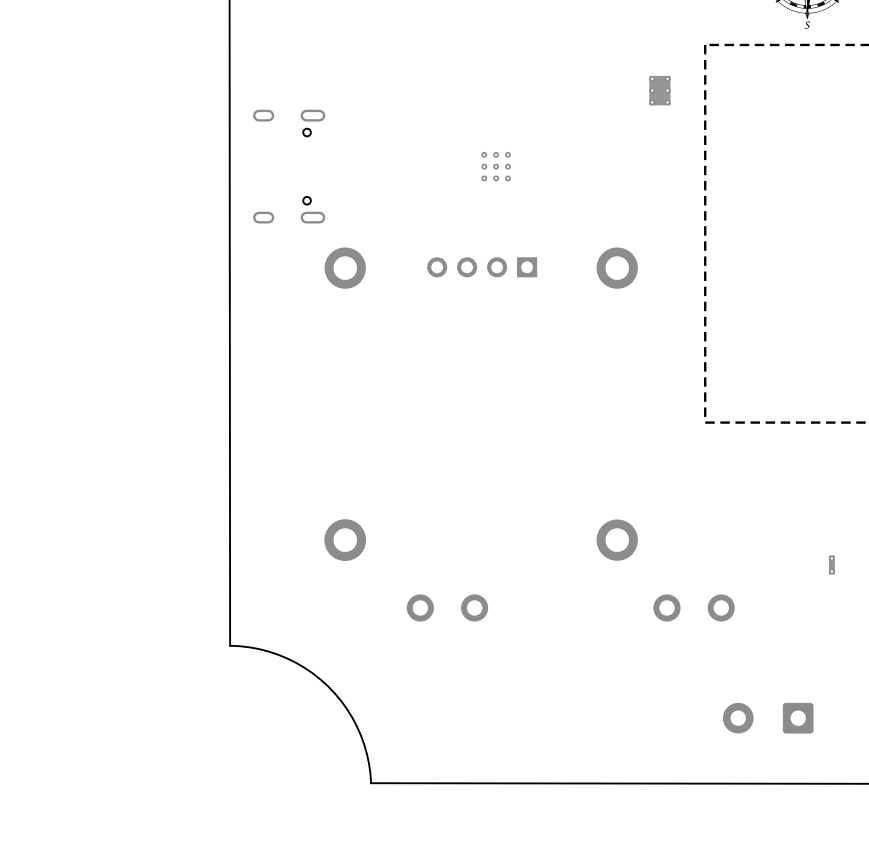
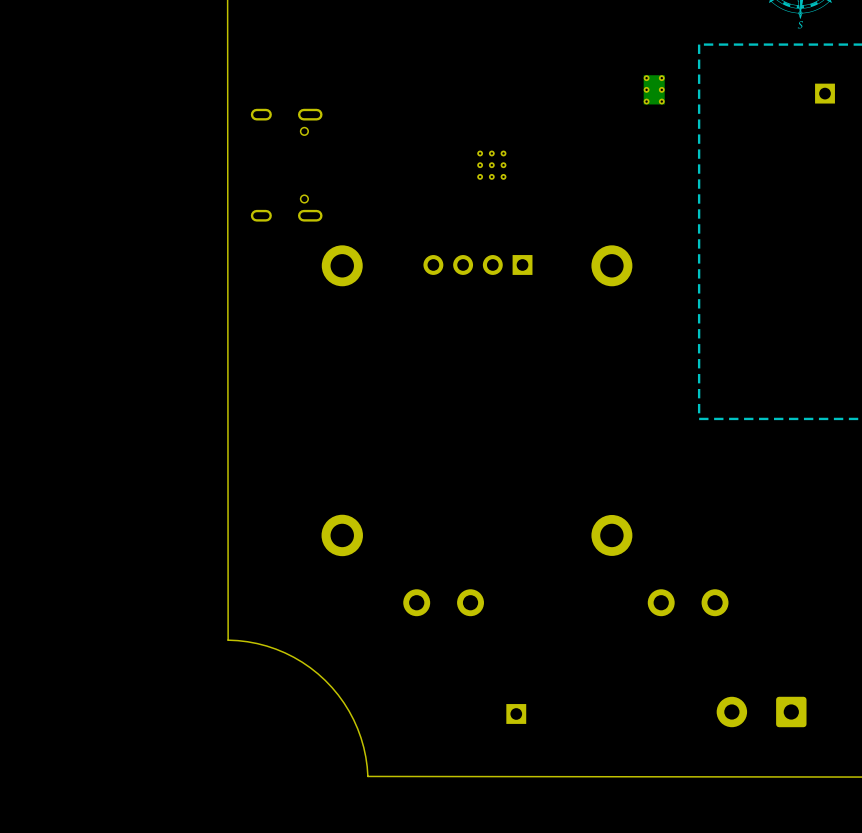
part: none -> (825, 93)
part: (831, 564) -> none
part: none -> (516, 713)

